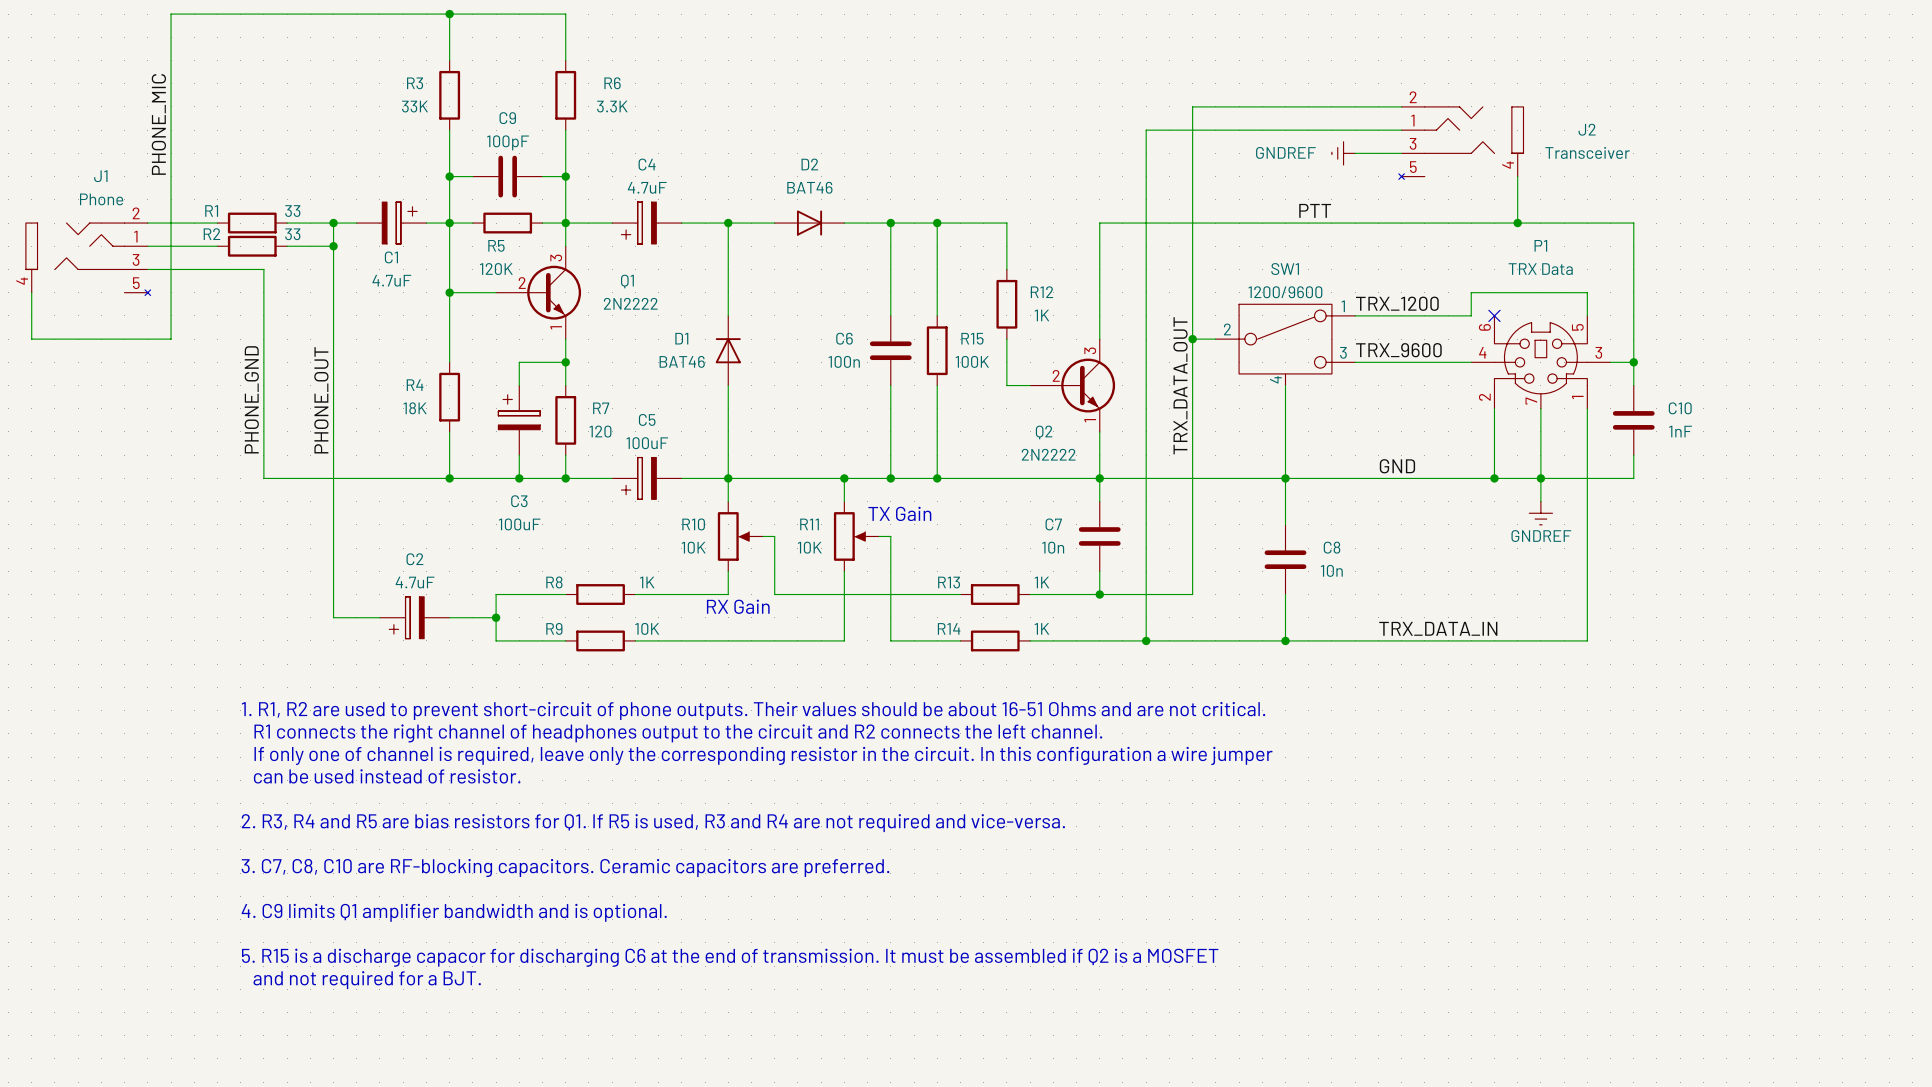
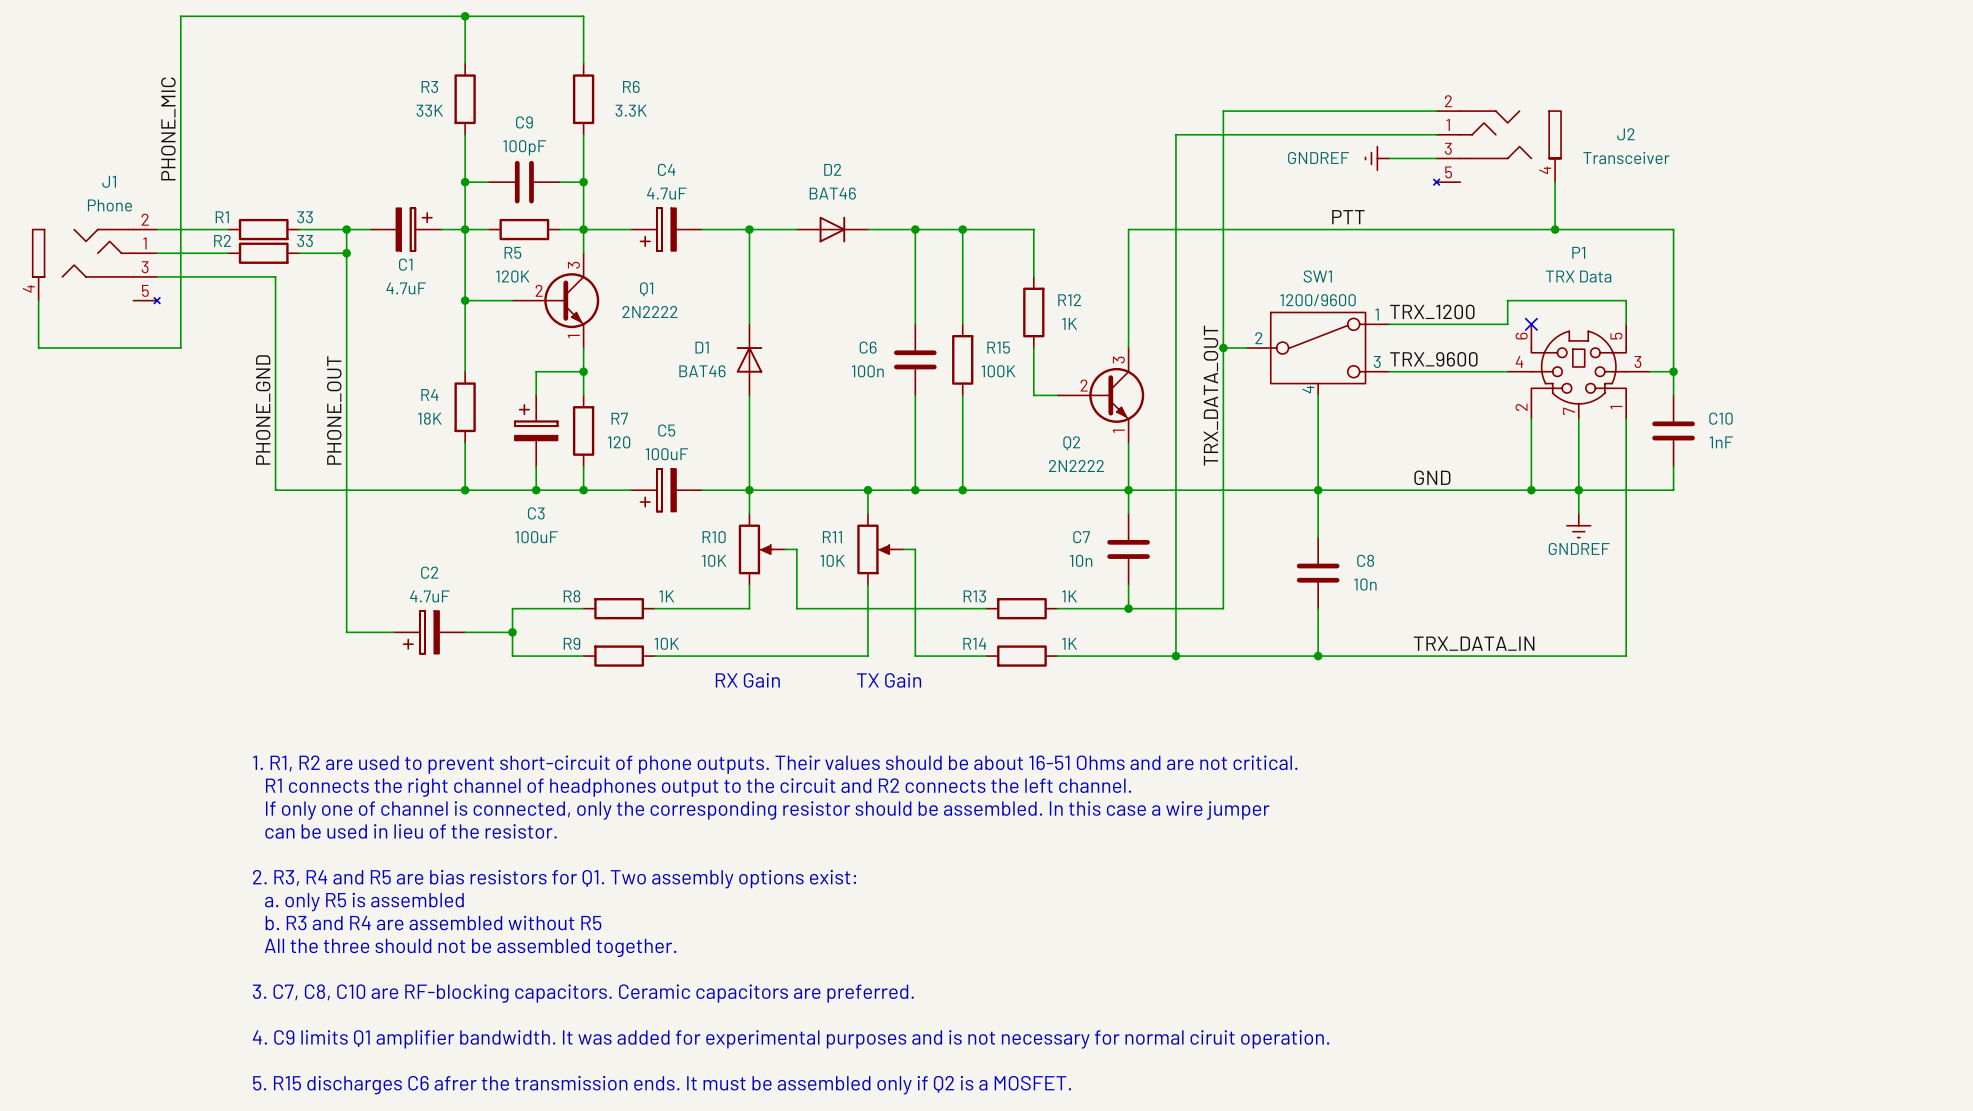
text position: TX Gain (899, 513) -> TX Gain (889, 680)
text position: RX Gain (738, 606) -> RX Gain (747, 680)
text position: 1. R1, R2 are used to prevent short-circuit of phone outputs. Their values should be about 16-51 Ohms and are not critical. (753, 710) -> 1. R1, R2 are used to prevent short-circuit of phone outputs. Their values should be about 16-51 Ohms and are not critical. (775, 764)
text position: R1 connects the right channel of headphones output to the circuit and R2 connects the left channel. (678, 733) -> R1 connects the right channel of headphones output to the circuit and R2 connects the left channel. (698, 787)
text: If only one of channel is required, leave only the corresponding resistor in the circuit. In this configuration a wire jumper (763, 755) -> none
text: can be used instead of resistor. (387, 776) -> none
text: none -> If only one of channel is connected, only the corresponding resistor should be assembled. In this case a wire jumper (767, 810)
text: 2. R3, R4 and R5 are bias resistors for Q1. If R5 is used, R3 and R4 are not required and vice-versa. (653, 823) -> can be used in lieu of the resistor. (411, 831)
text: none -> 2. R3, R4 and R5 are bias resistors for Q1. Two assembly options exist: (554, 879)
text position: 3. C7, C8, C10 are RF-blocking capacitors. Ceramic capacitors are preferred. (565, 868) -> 3. C7, C8, C10 are RF-blocking capacitors. Ceramic capacitors are preferred. (583, 993)
text: none -> a. only R5 is assembled (364, 902)
text: none -> b. R3 and R4 are assembled without R5 (433, 923)
text: 4. C9 limits Q1 amplifier bandwidth and is optional. (454, 912) -> none
text: none -> All the three should not be assembled together. (470, 947)
text: 5. R15 is a discharge capacor for discharging C6 at the end of transmission. It must be assembled if Q2 is a MOSFET (730, 957) -> none
text: and not required for a BJT. (367, 980) -> none
text: none -> 4. C9 limits Q1 amplifier bandwidth. It was added for experimental purposes and is not necessary for normal ciruit operation. (791, 1039)
text: none -> 5. R15 discharges C6 afrer the transmission ends. It must be assembled only if Q2 is a MOSFET. (662, 1085)

